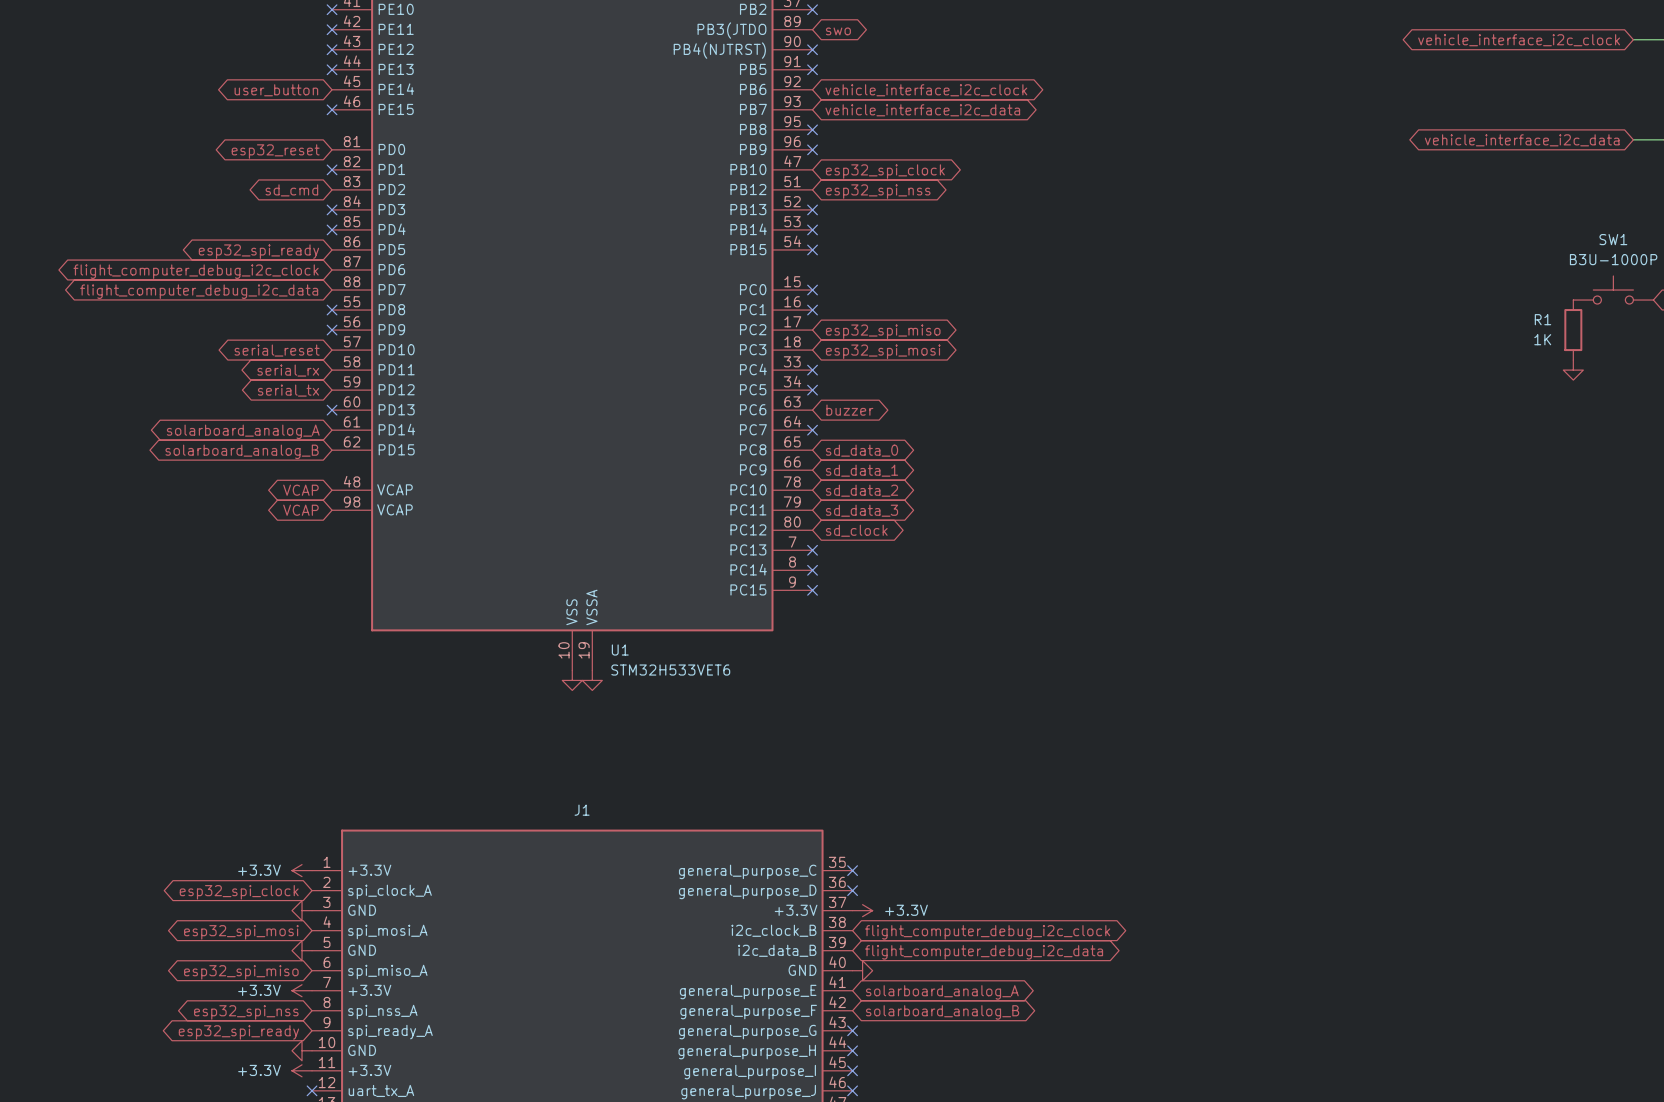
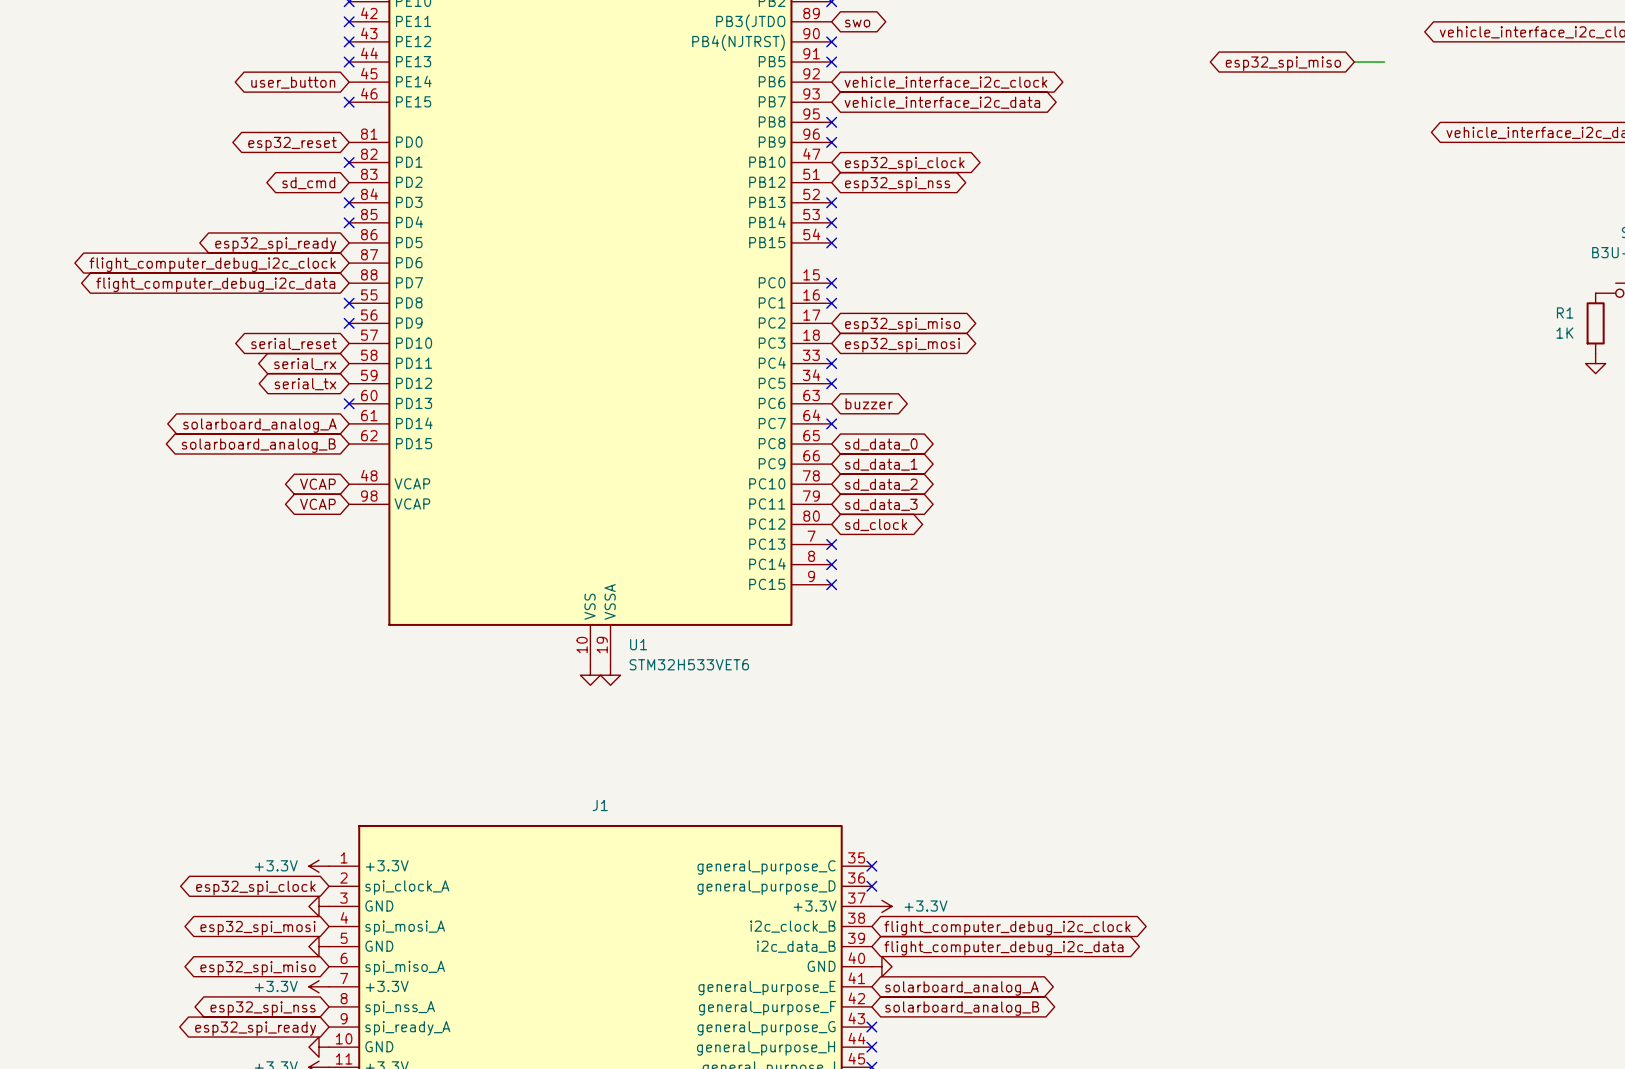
wire: none -> (1354, 62) (1384, 62)
global label: none -> esp32_spi_miso (1283, 63)

